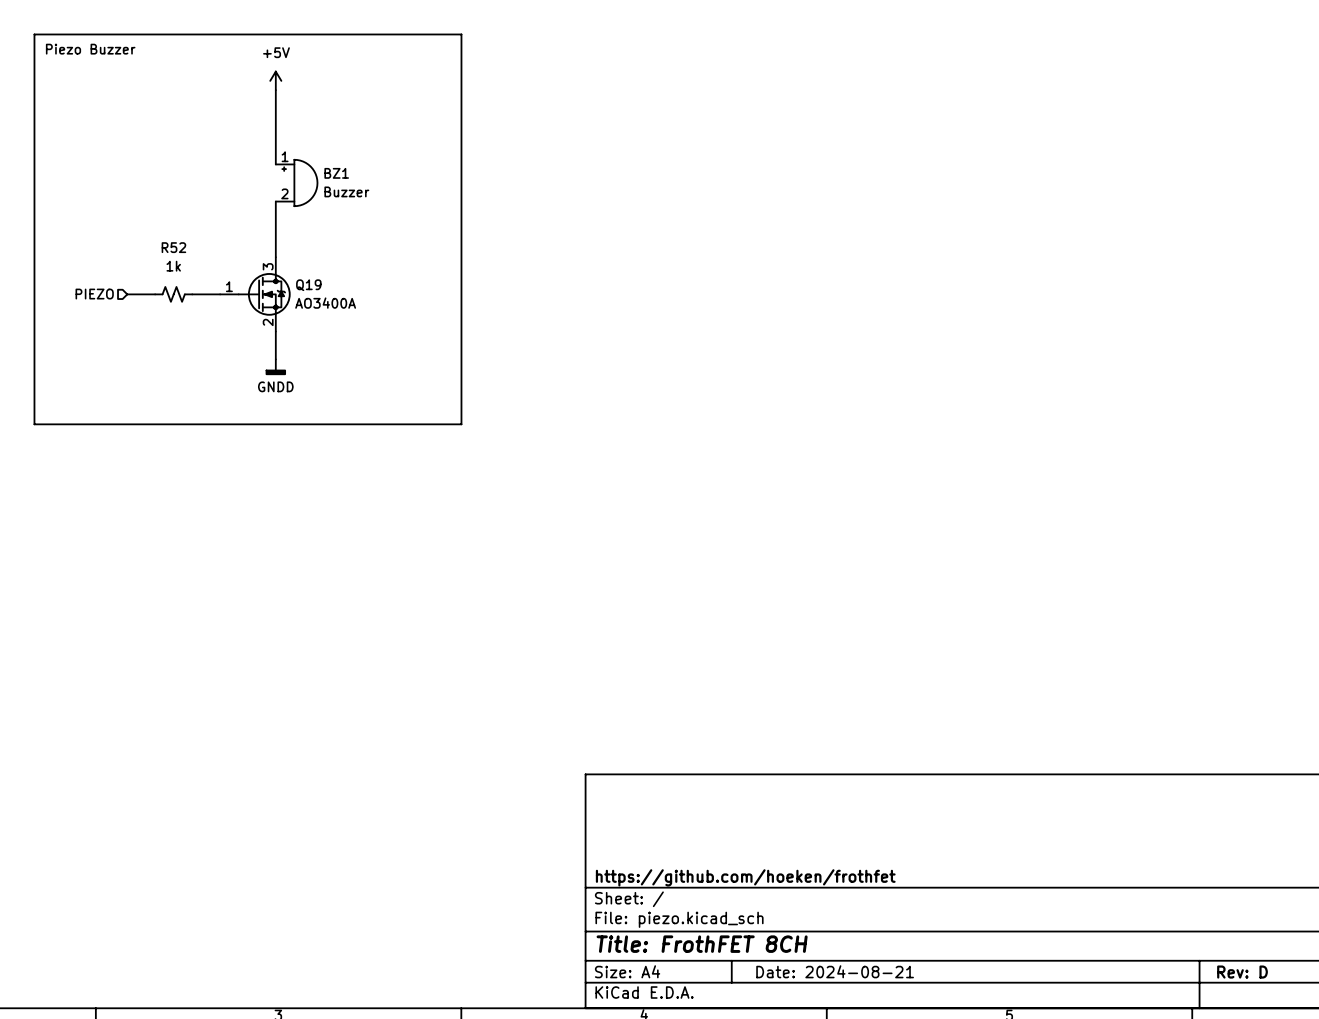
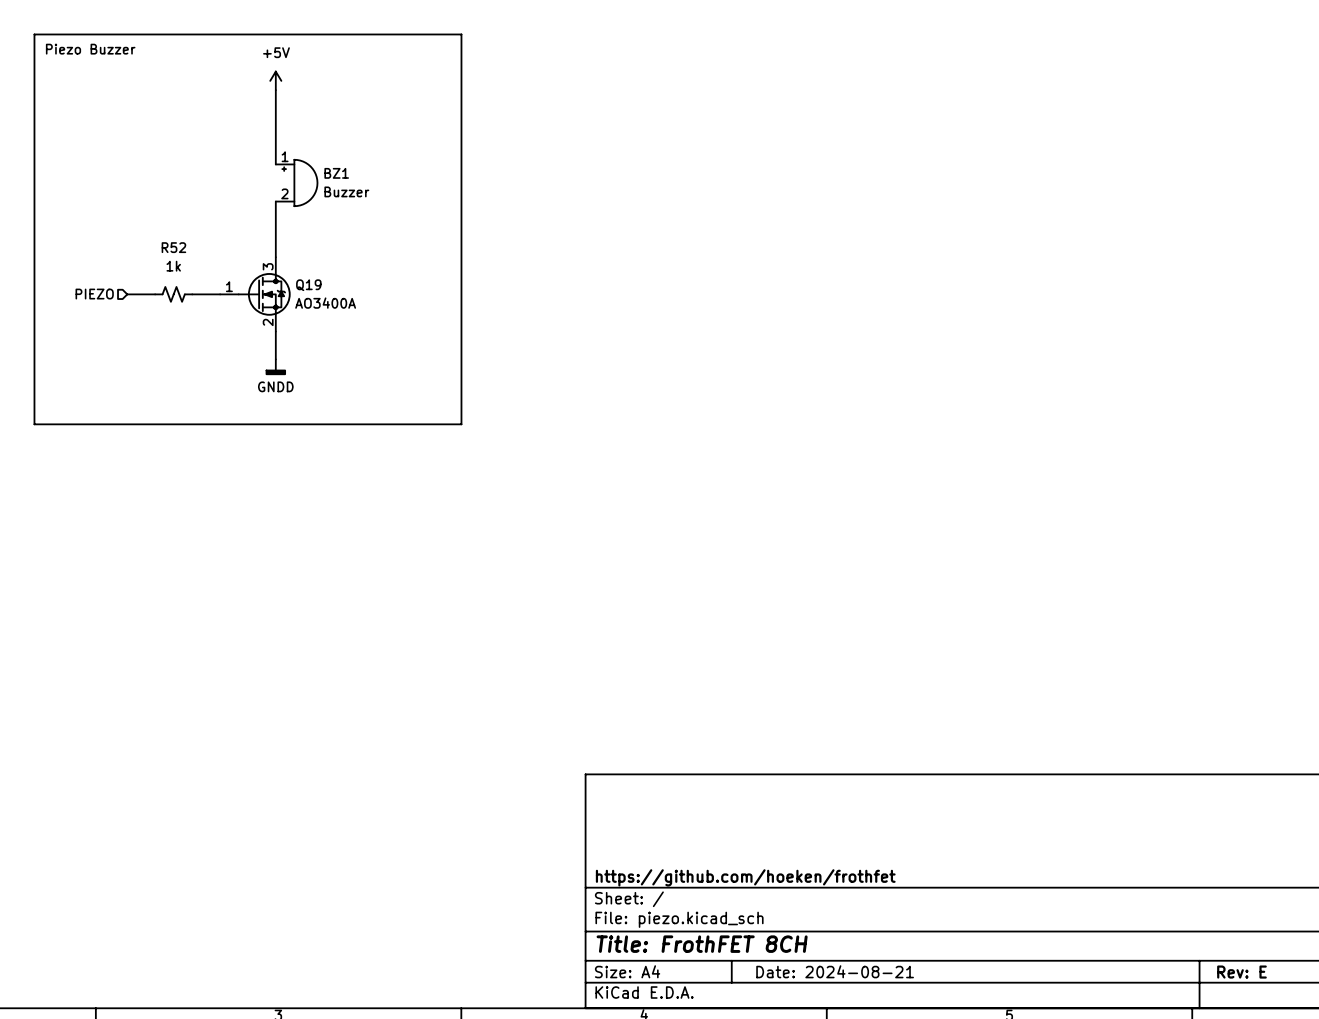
title block: Rev: D (1242, 972) -> Rev: E (1241, 972)

